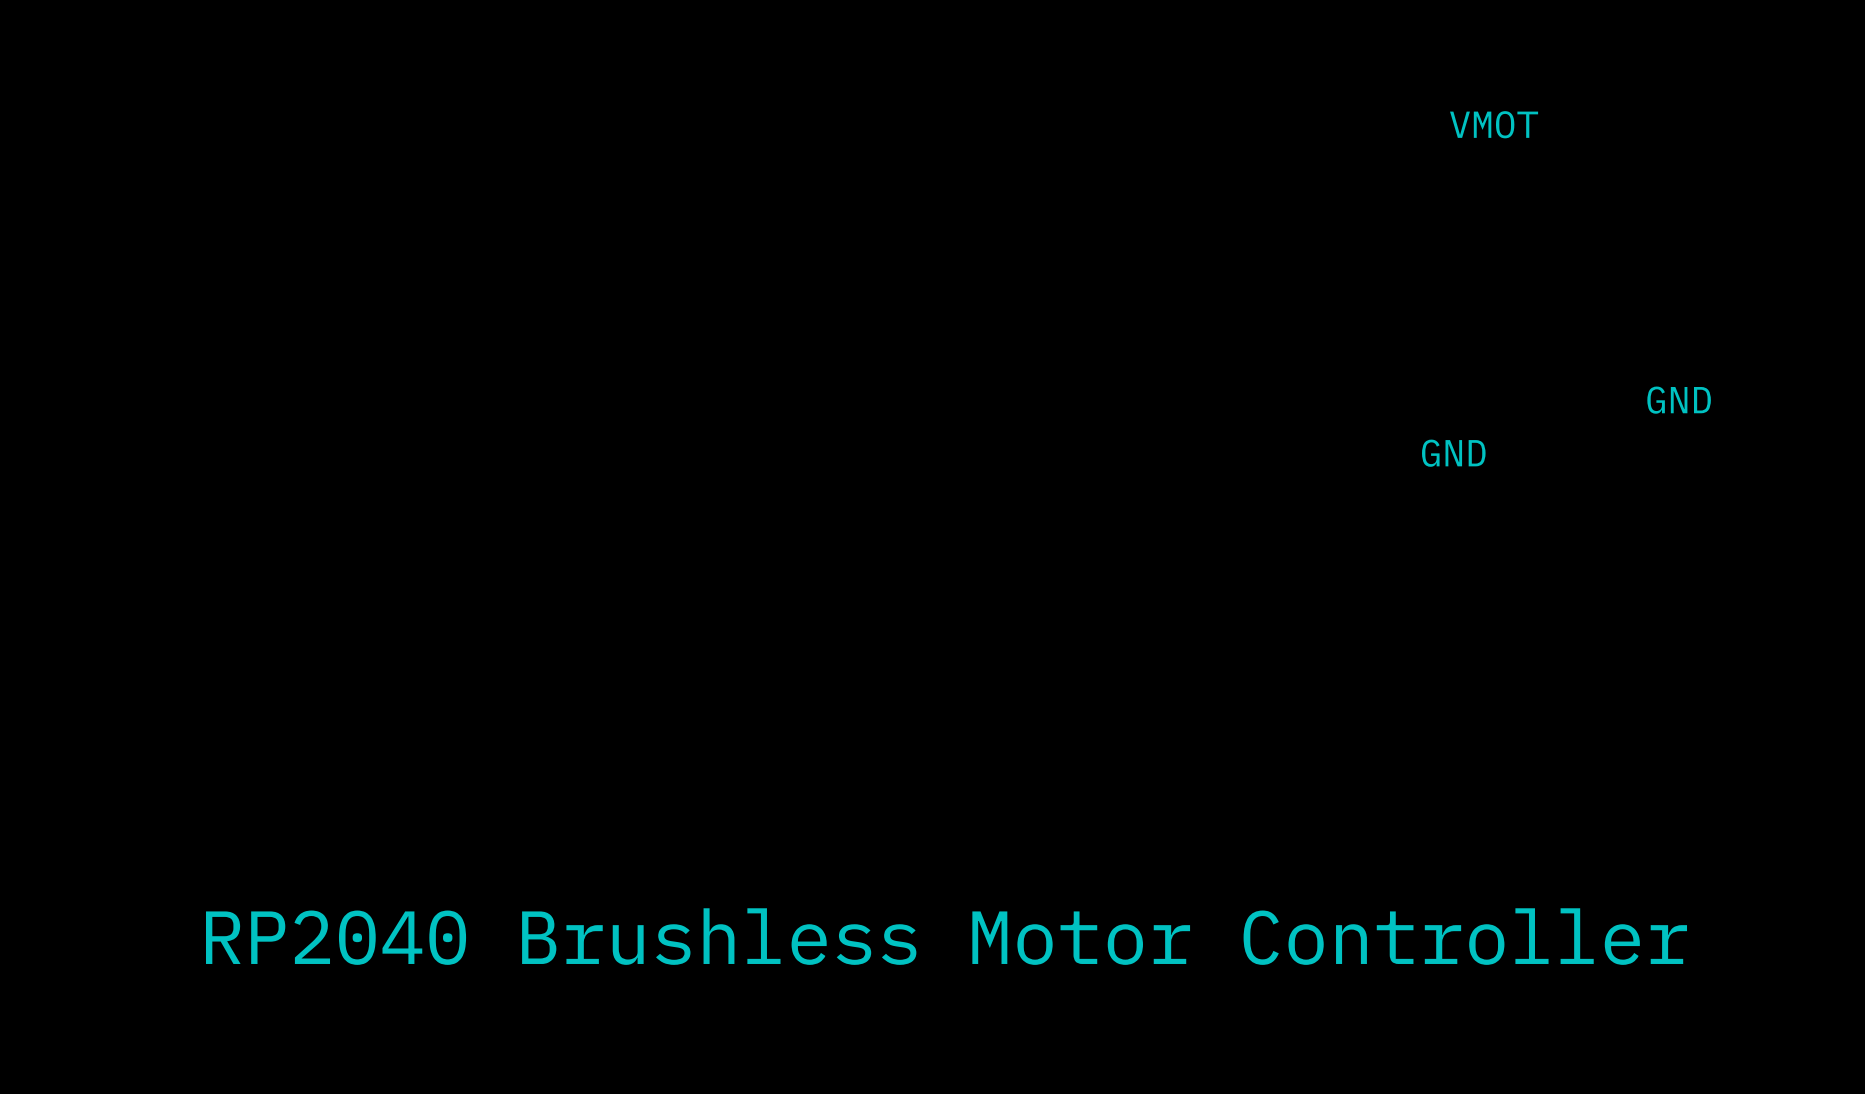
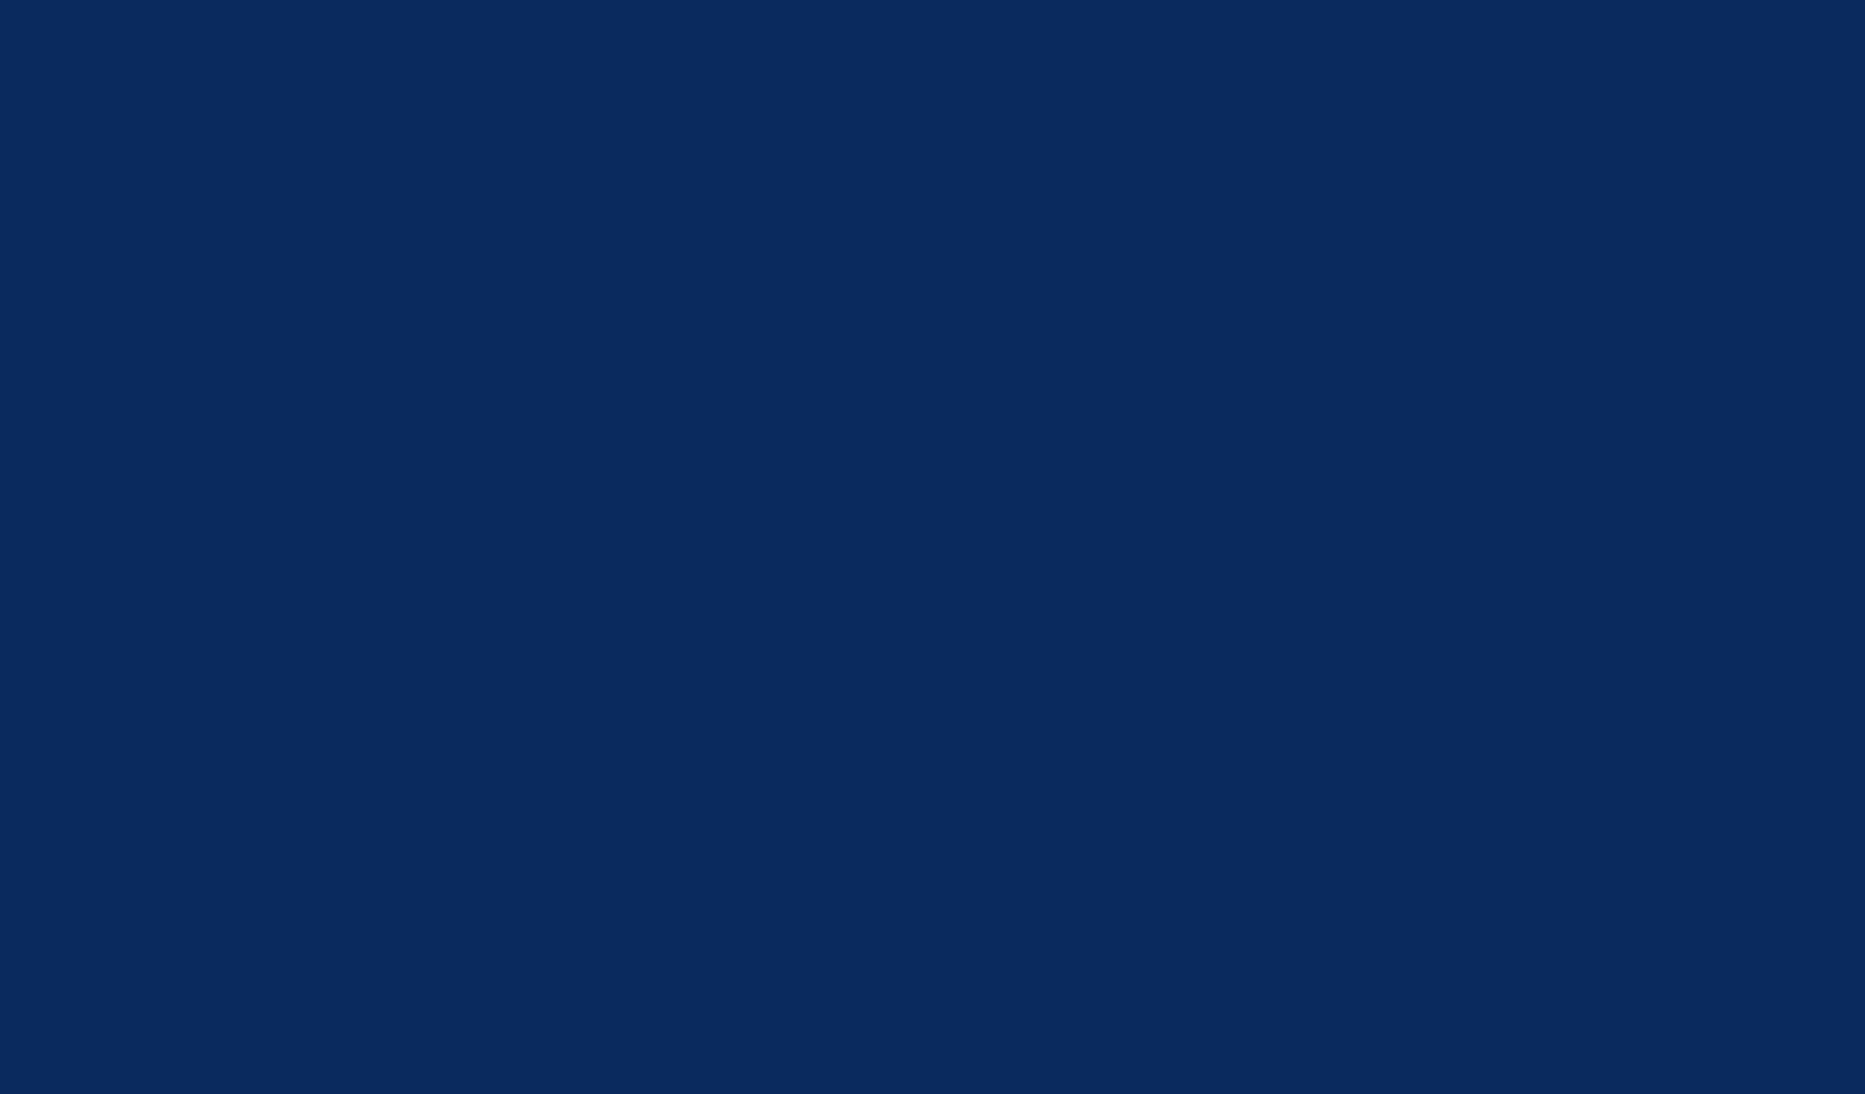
text: VMOT (1494, 124) -> none
text: GND (1679, 400) -> none
text: GND (1453, 453) -> none
text: RP2040 Brushless Motor Controller (946, 936) -> none

